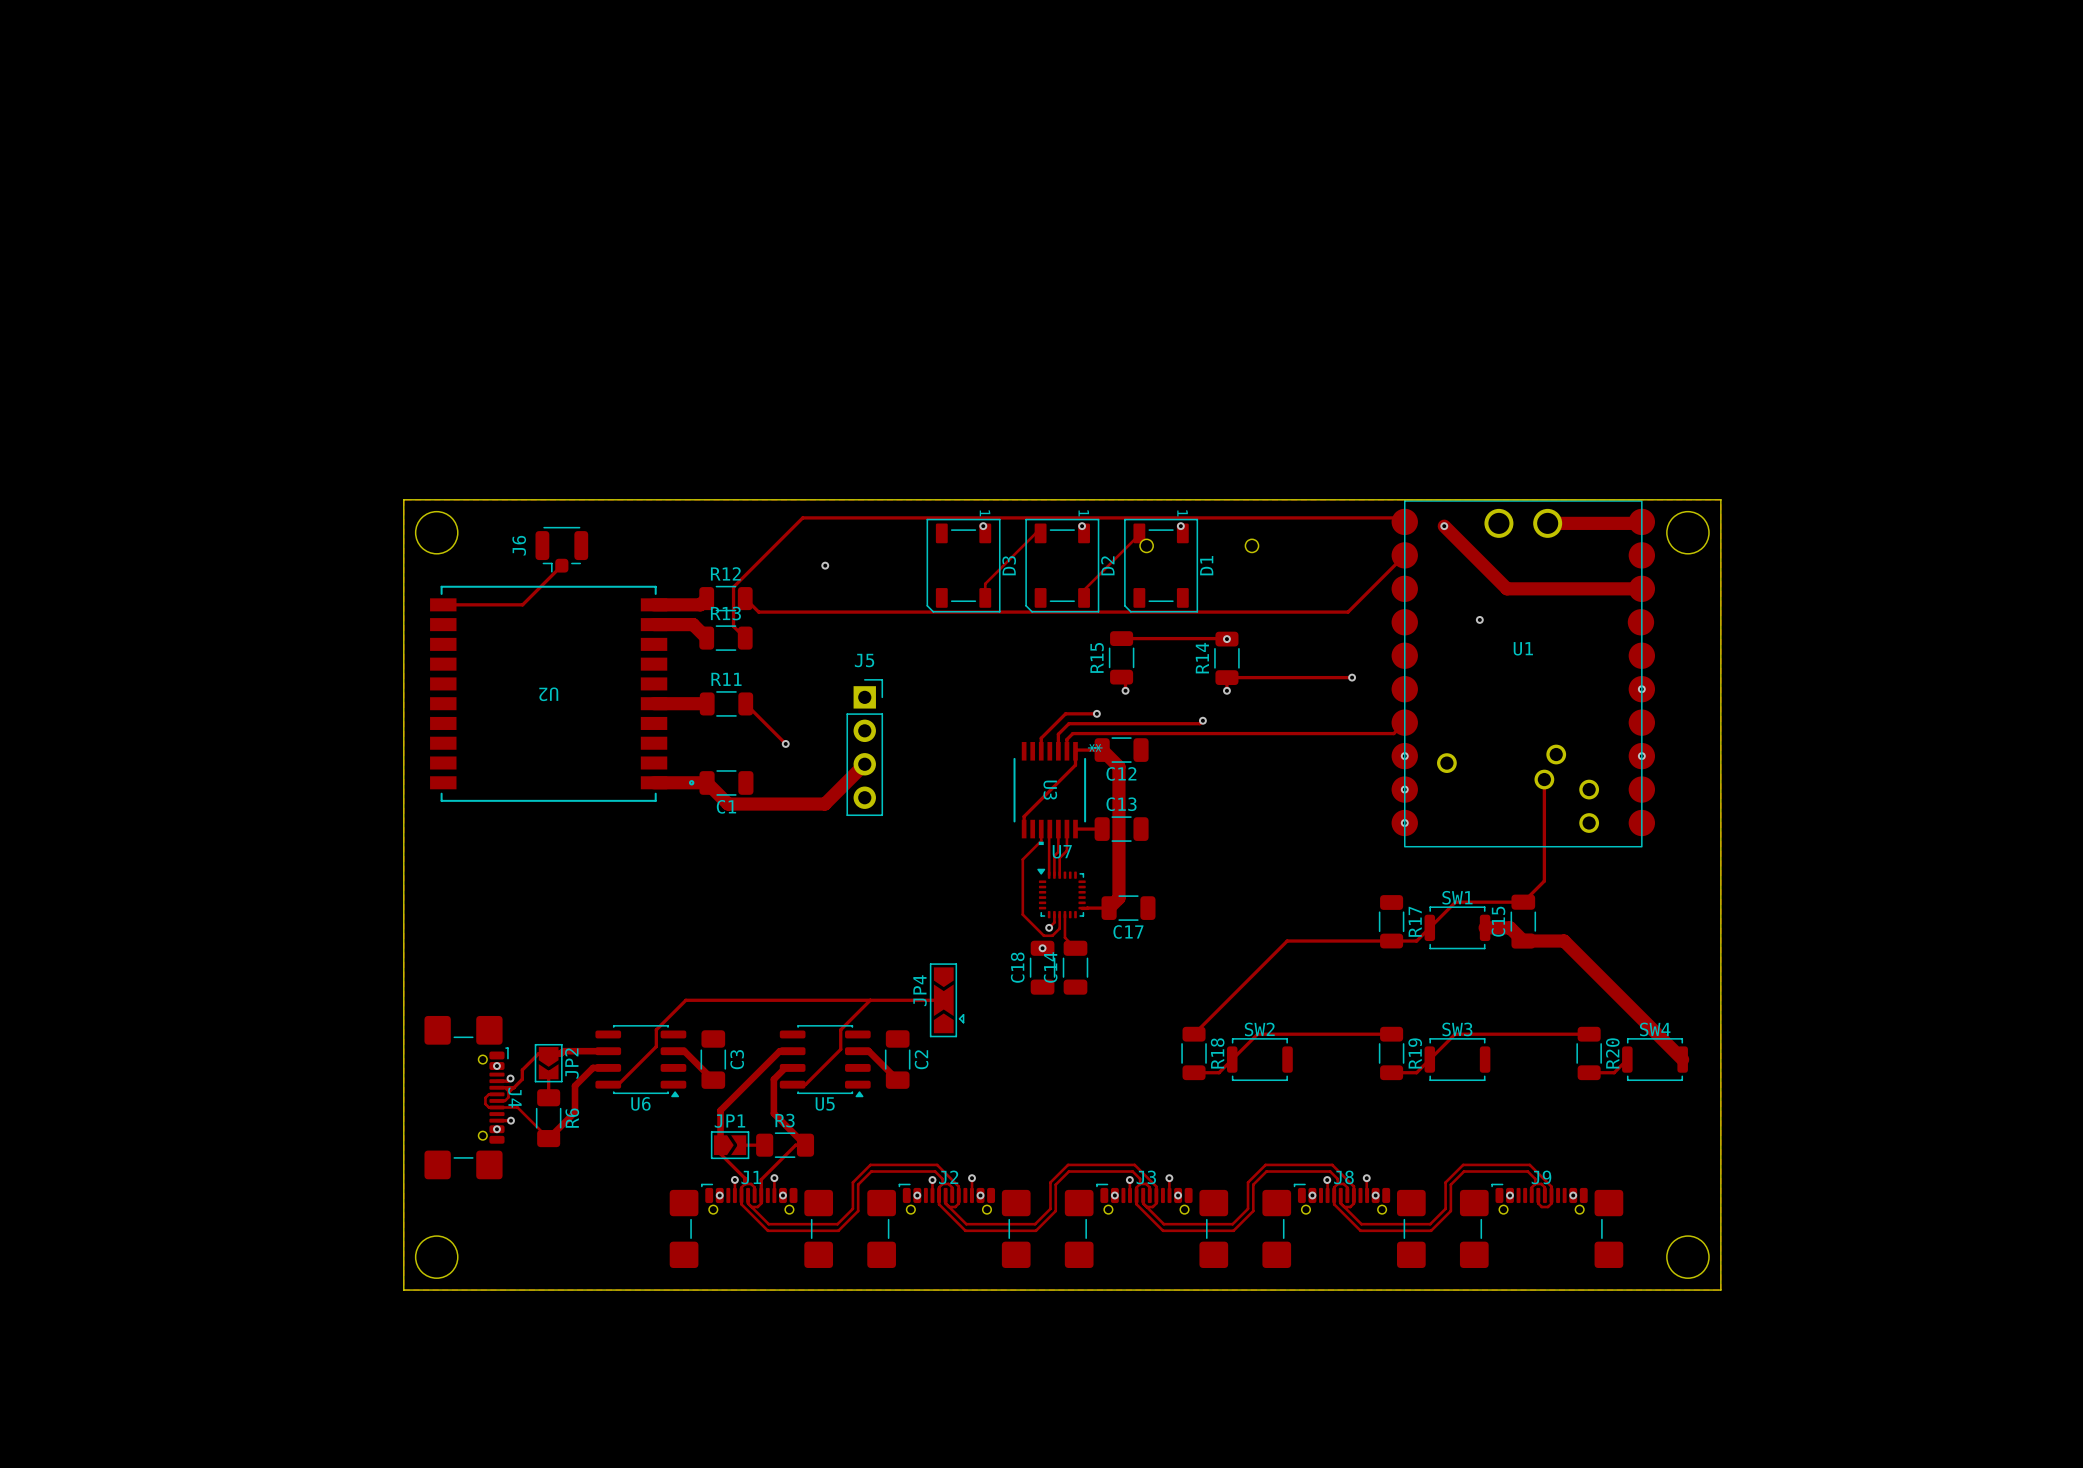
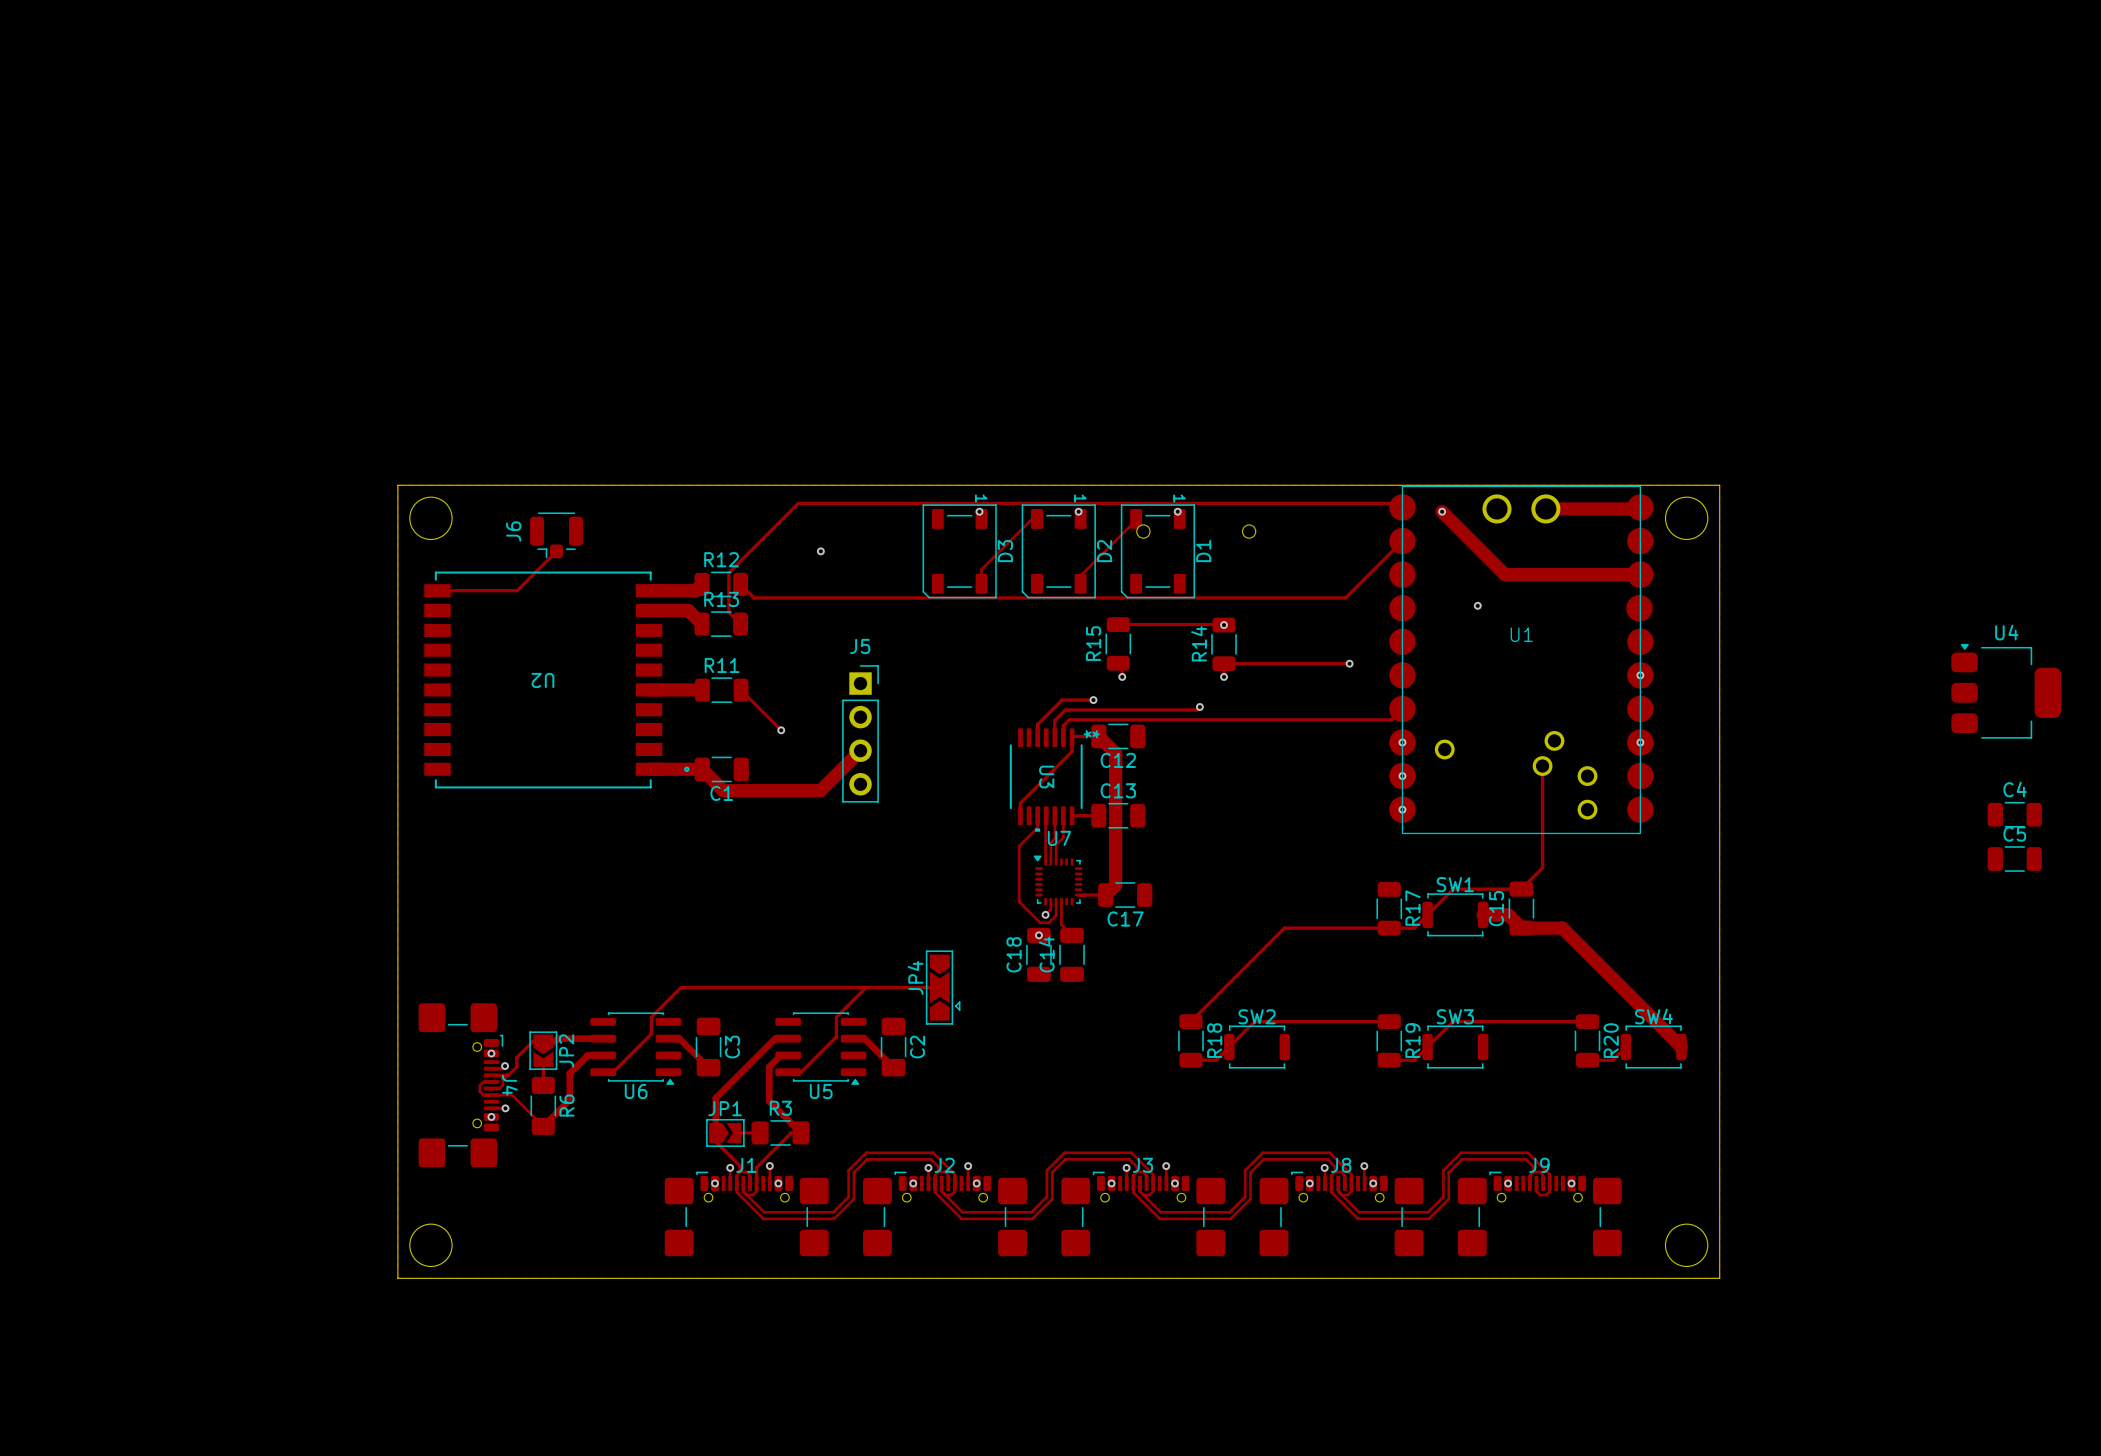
U4: none -> (2006, 691)
C4: none -> (2014, 814)
C5: none -> (2014, 859)

